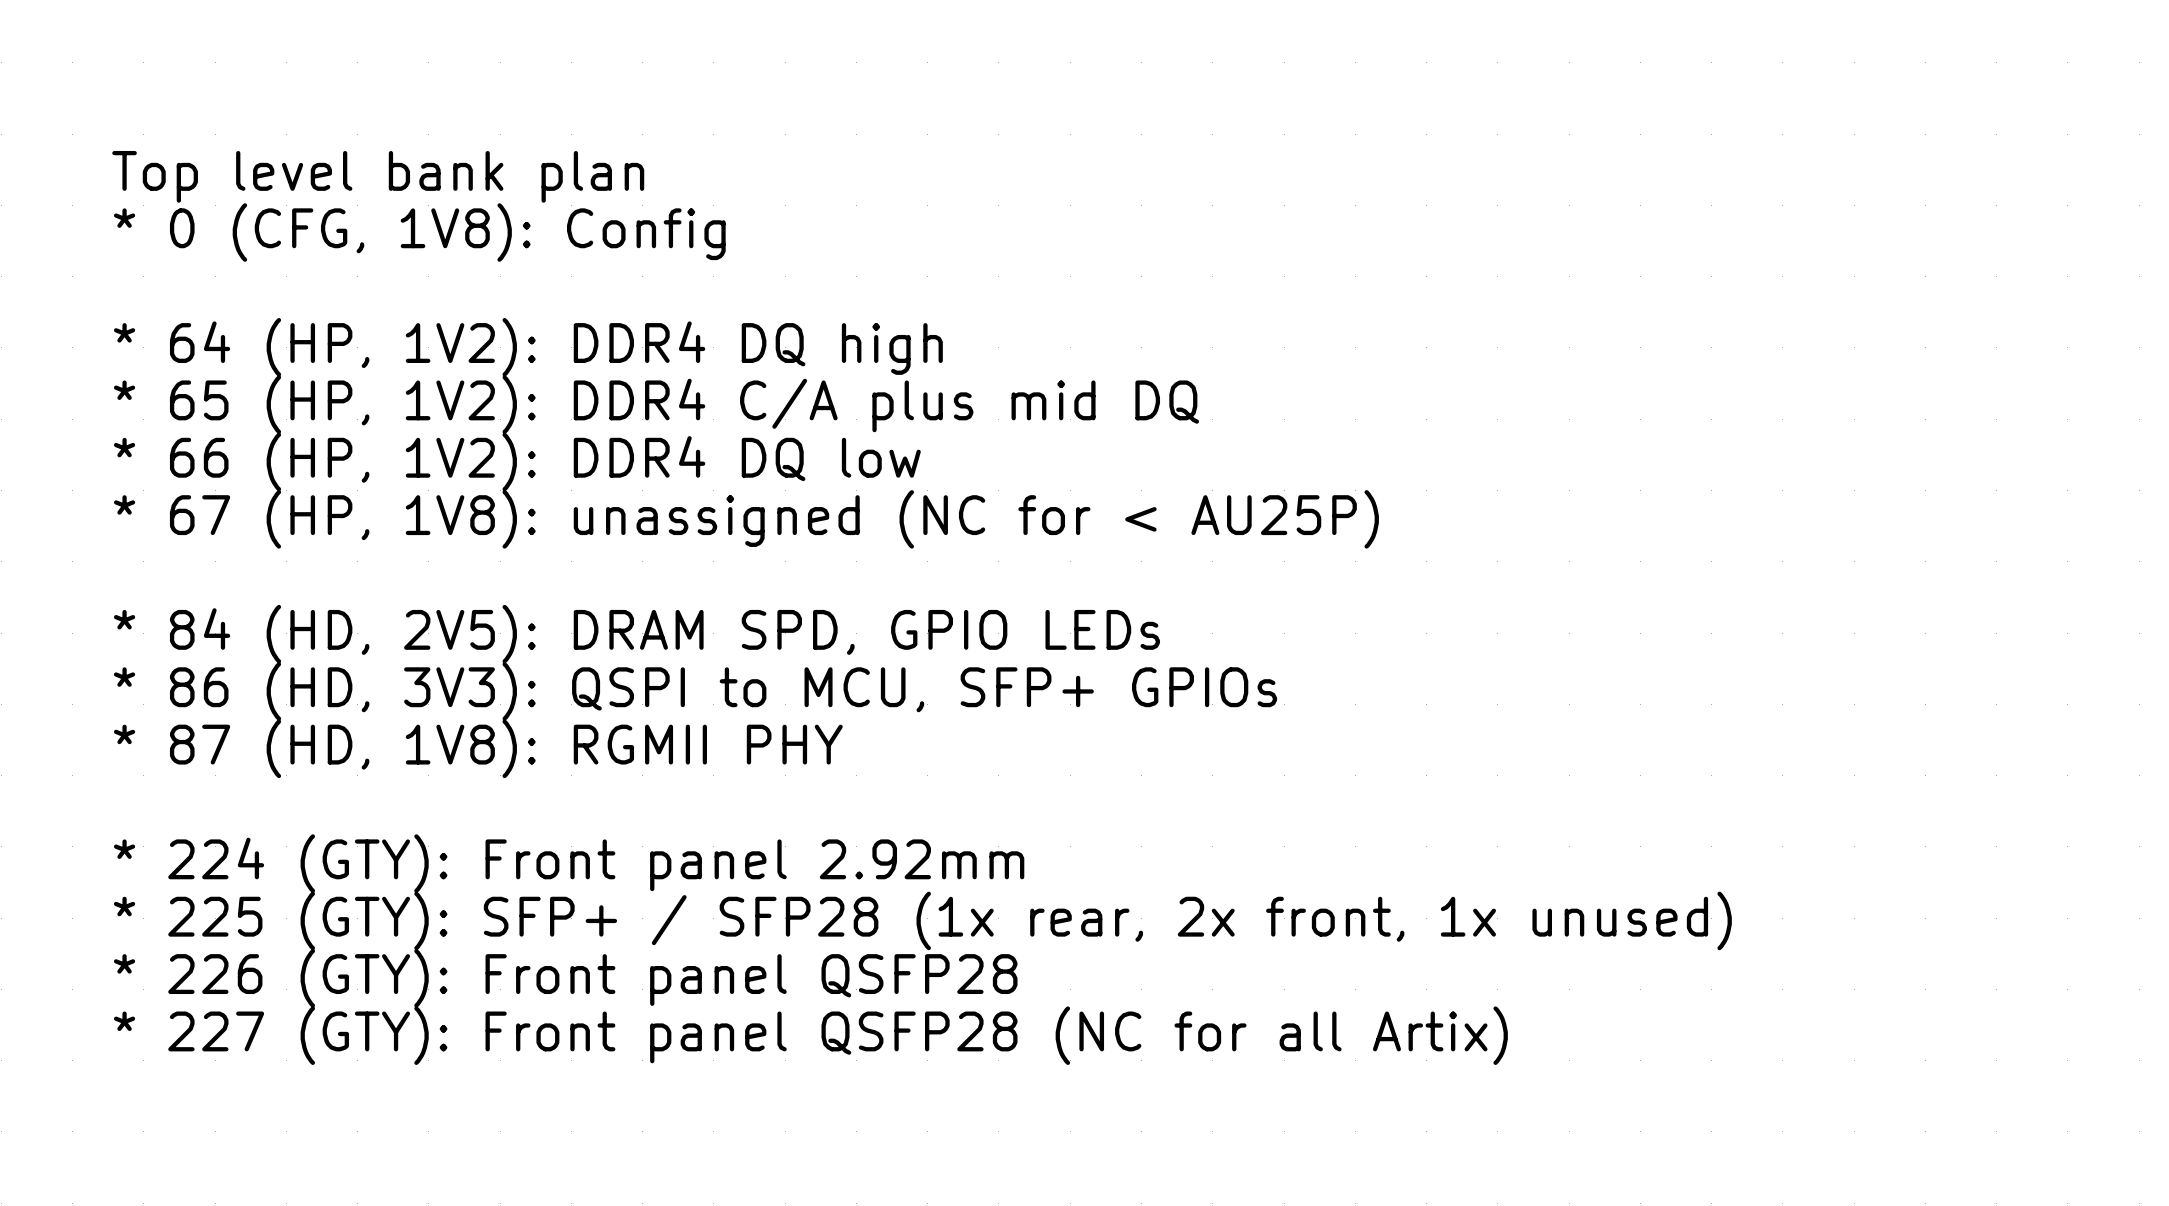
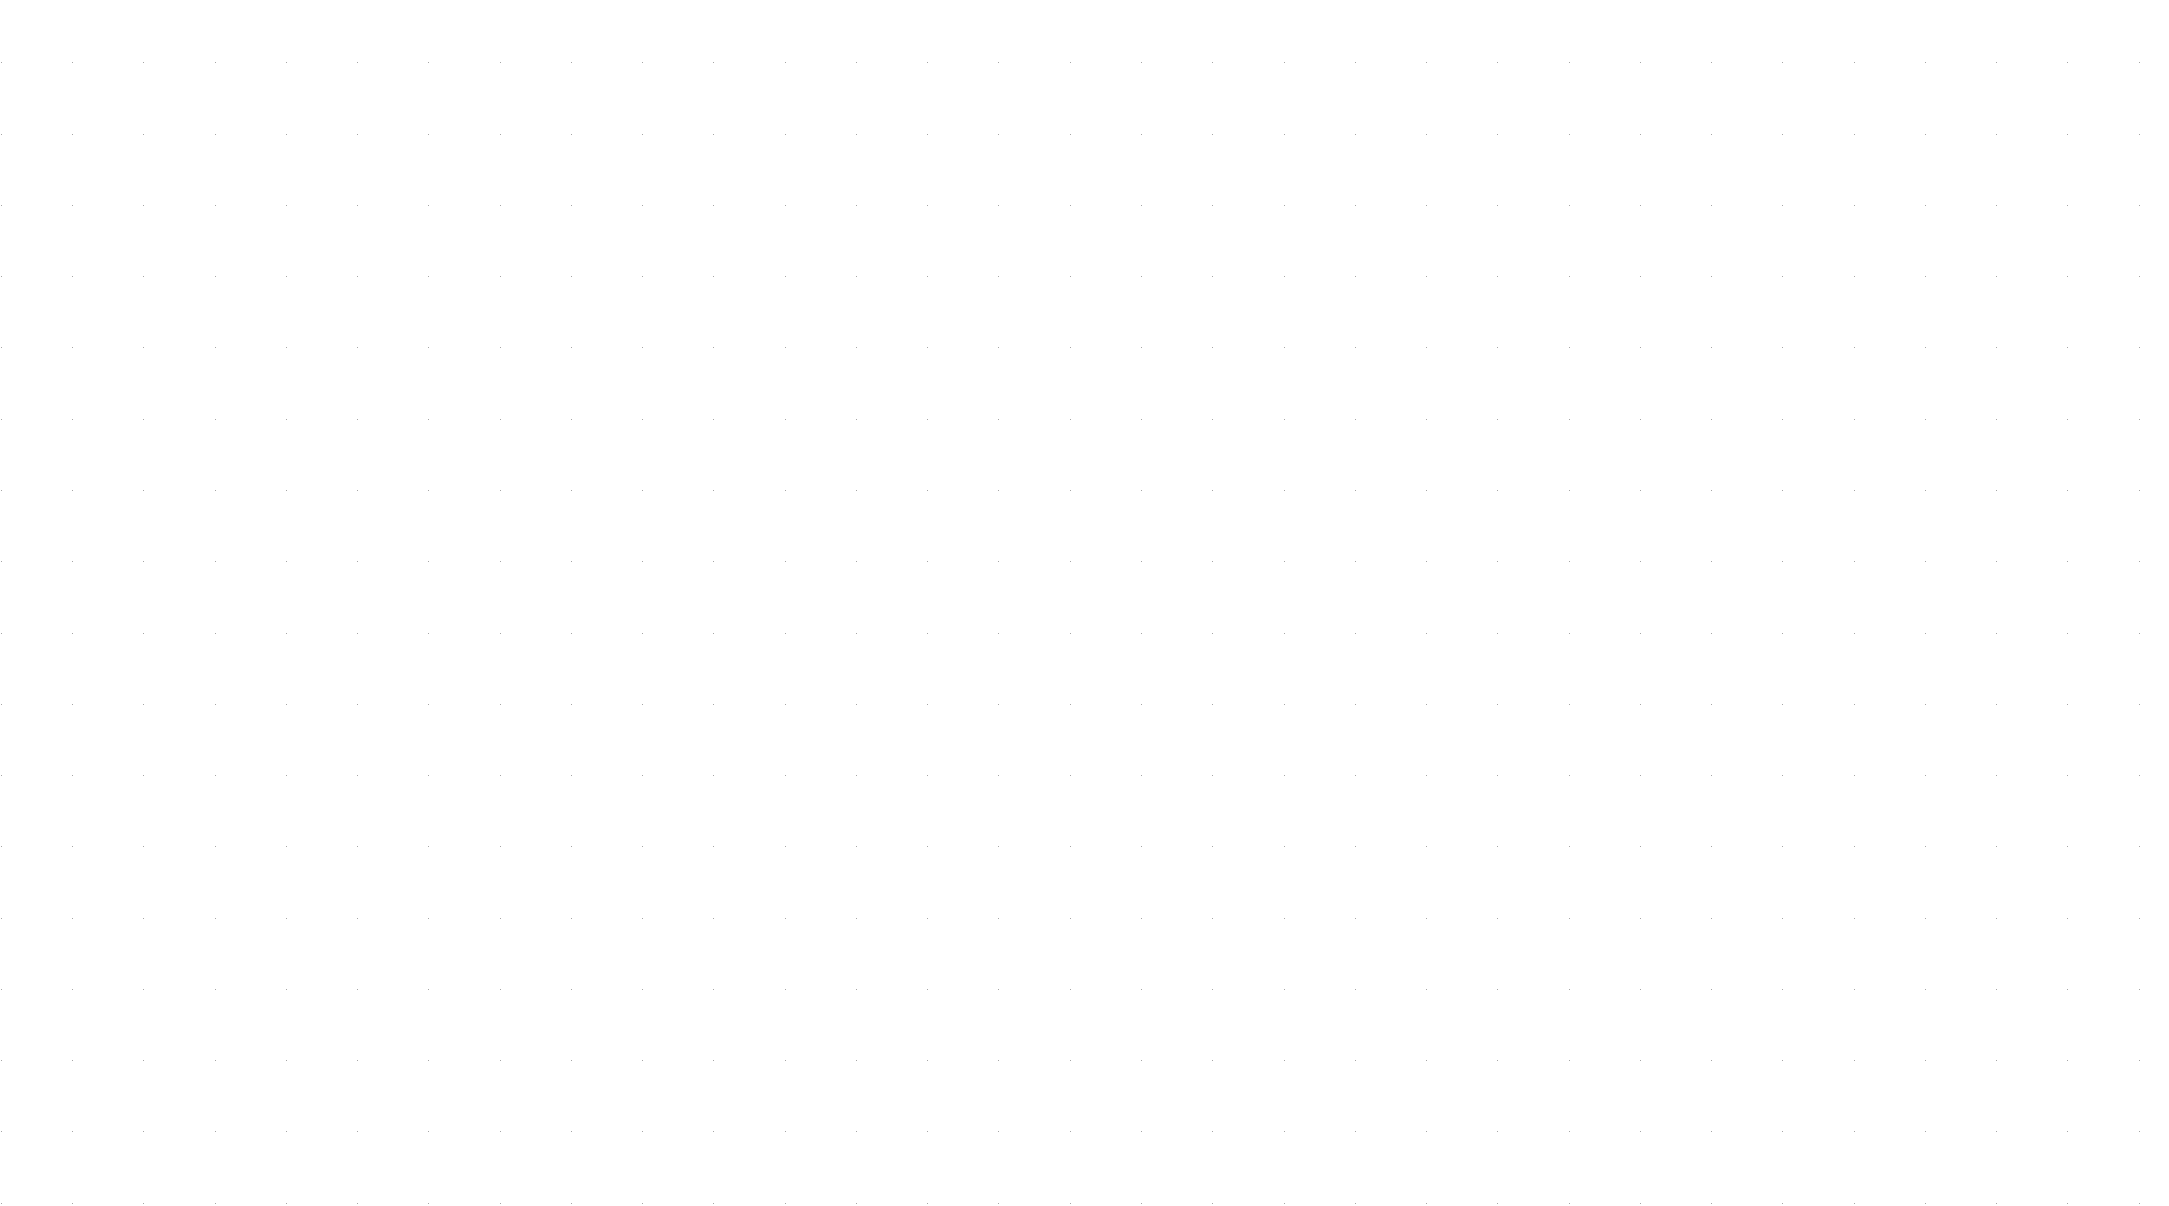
text: Top level bank plan (378, 176) -> none
text: * 0 (CFG, 1V8): Config (419, 232) -> none
text: * 64 (HP, 1V2): DDR4 DQ high (528, 347) -> none
text: * 65 (HP, 1V2): DDR4 C/A plus mid DQ (656, 404) -> none
text: * 66 (HP, 1V2): DDR4 DQ low (517, 462) -> none
text: * 67 (HP, 1V8): unassigned (NC for < AU25P) (746, 519) -> none
text: * 84 (HD, 2V5): DRAM SPD, GPIO LEDs (636, 634) -> none
text: * 86 (HD, 3V3): QSPI to MCU, SFP+ GPIOs (695, 691) -> none
text: * 87 (HD, 1V8): RGMII PHY (478, 748) -> none
text: * 224 (GTY): Front panel 2.92mm (569, 863) -> none
text: * 225 (GTY): SFP+ / SFP28 (1x rear, 2x front, 1x unused) (922, 920) -> none
text: * 226 (GTY): Front panel QSFP28 (565, 978) -> none
text: * 227 (GTY): Front panel QSFP28 (NC for all Artix) (810, 1035) -> none

